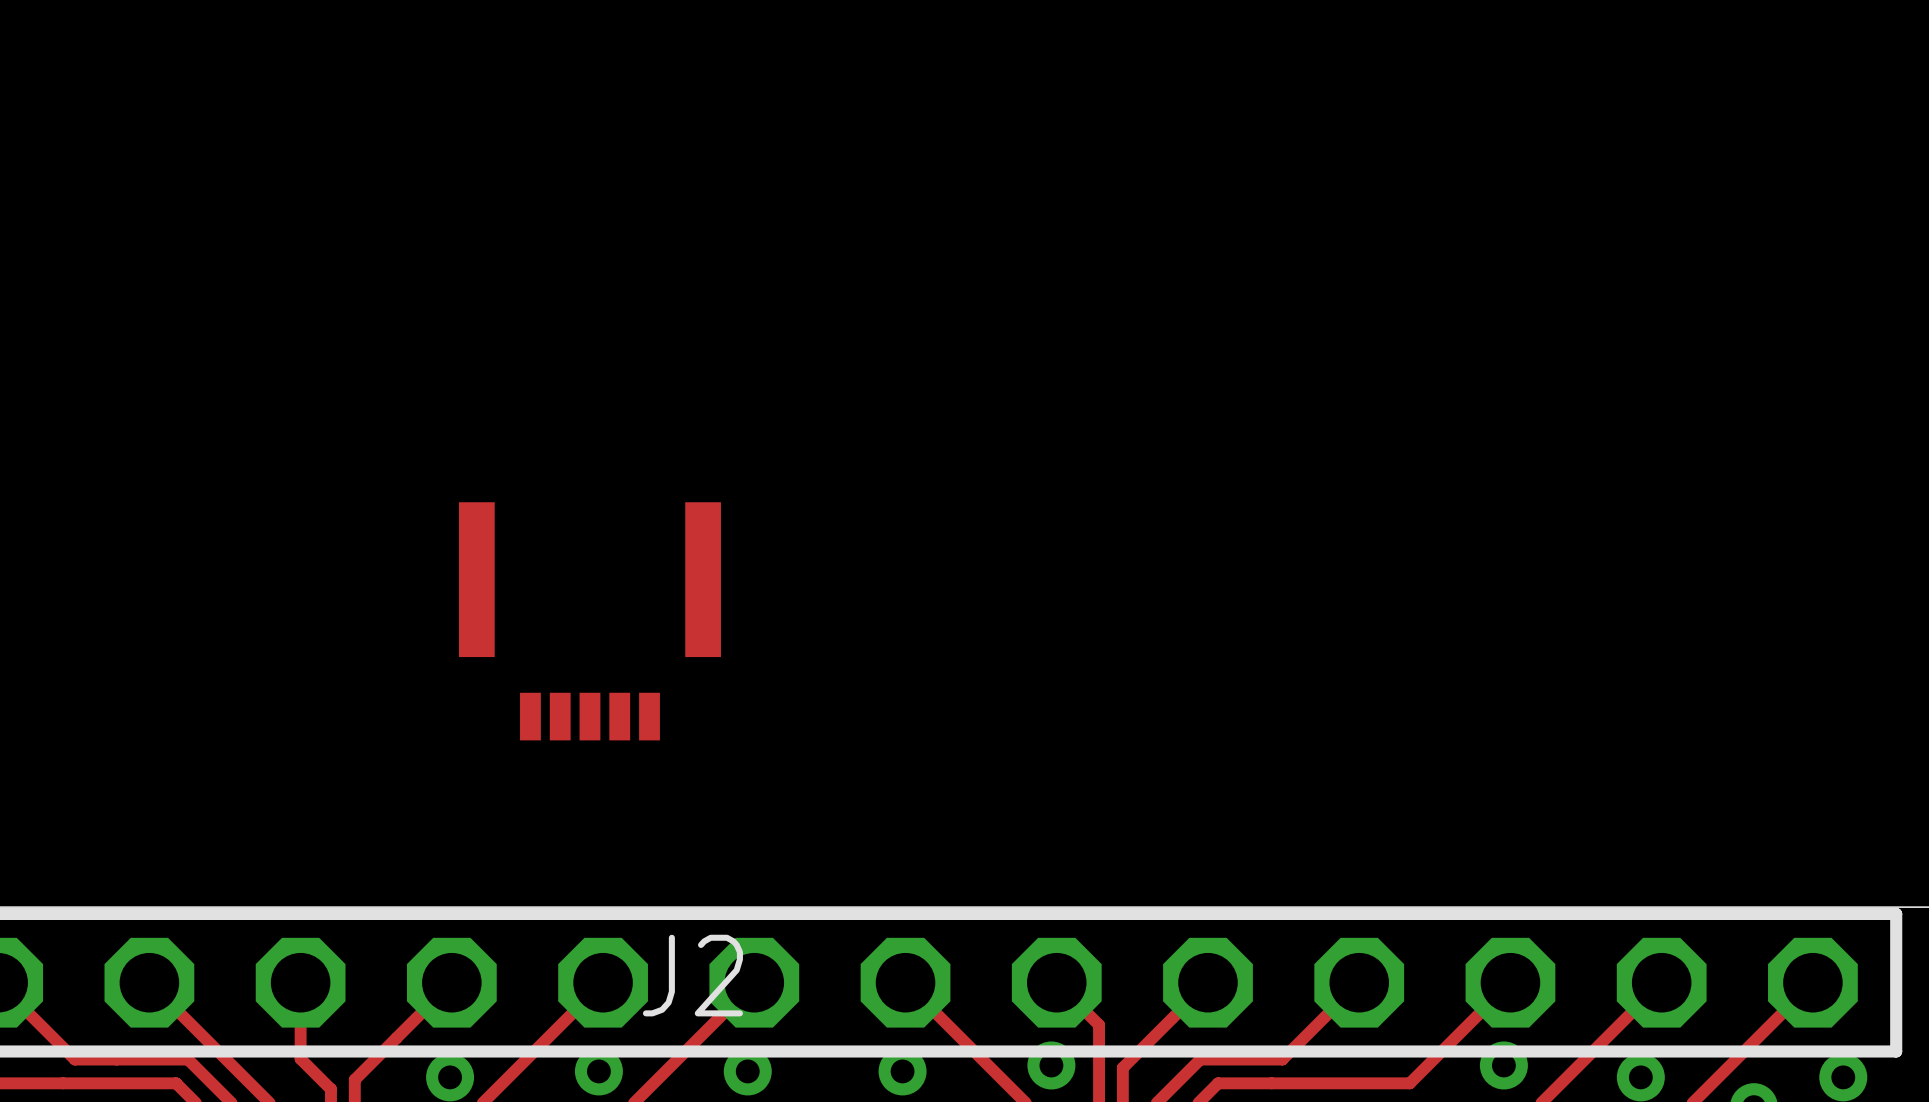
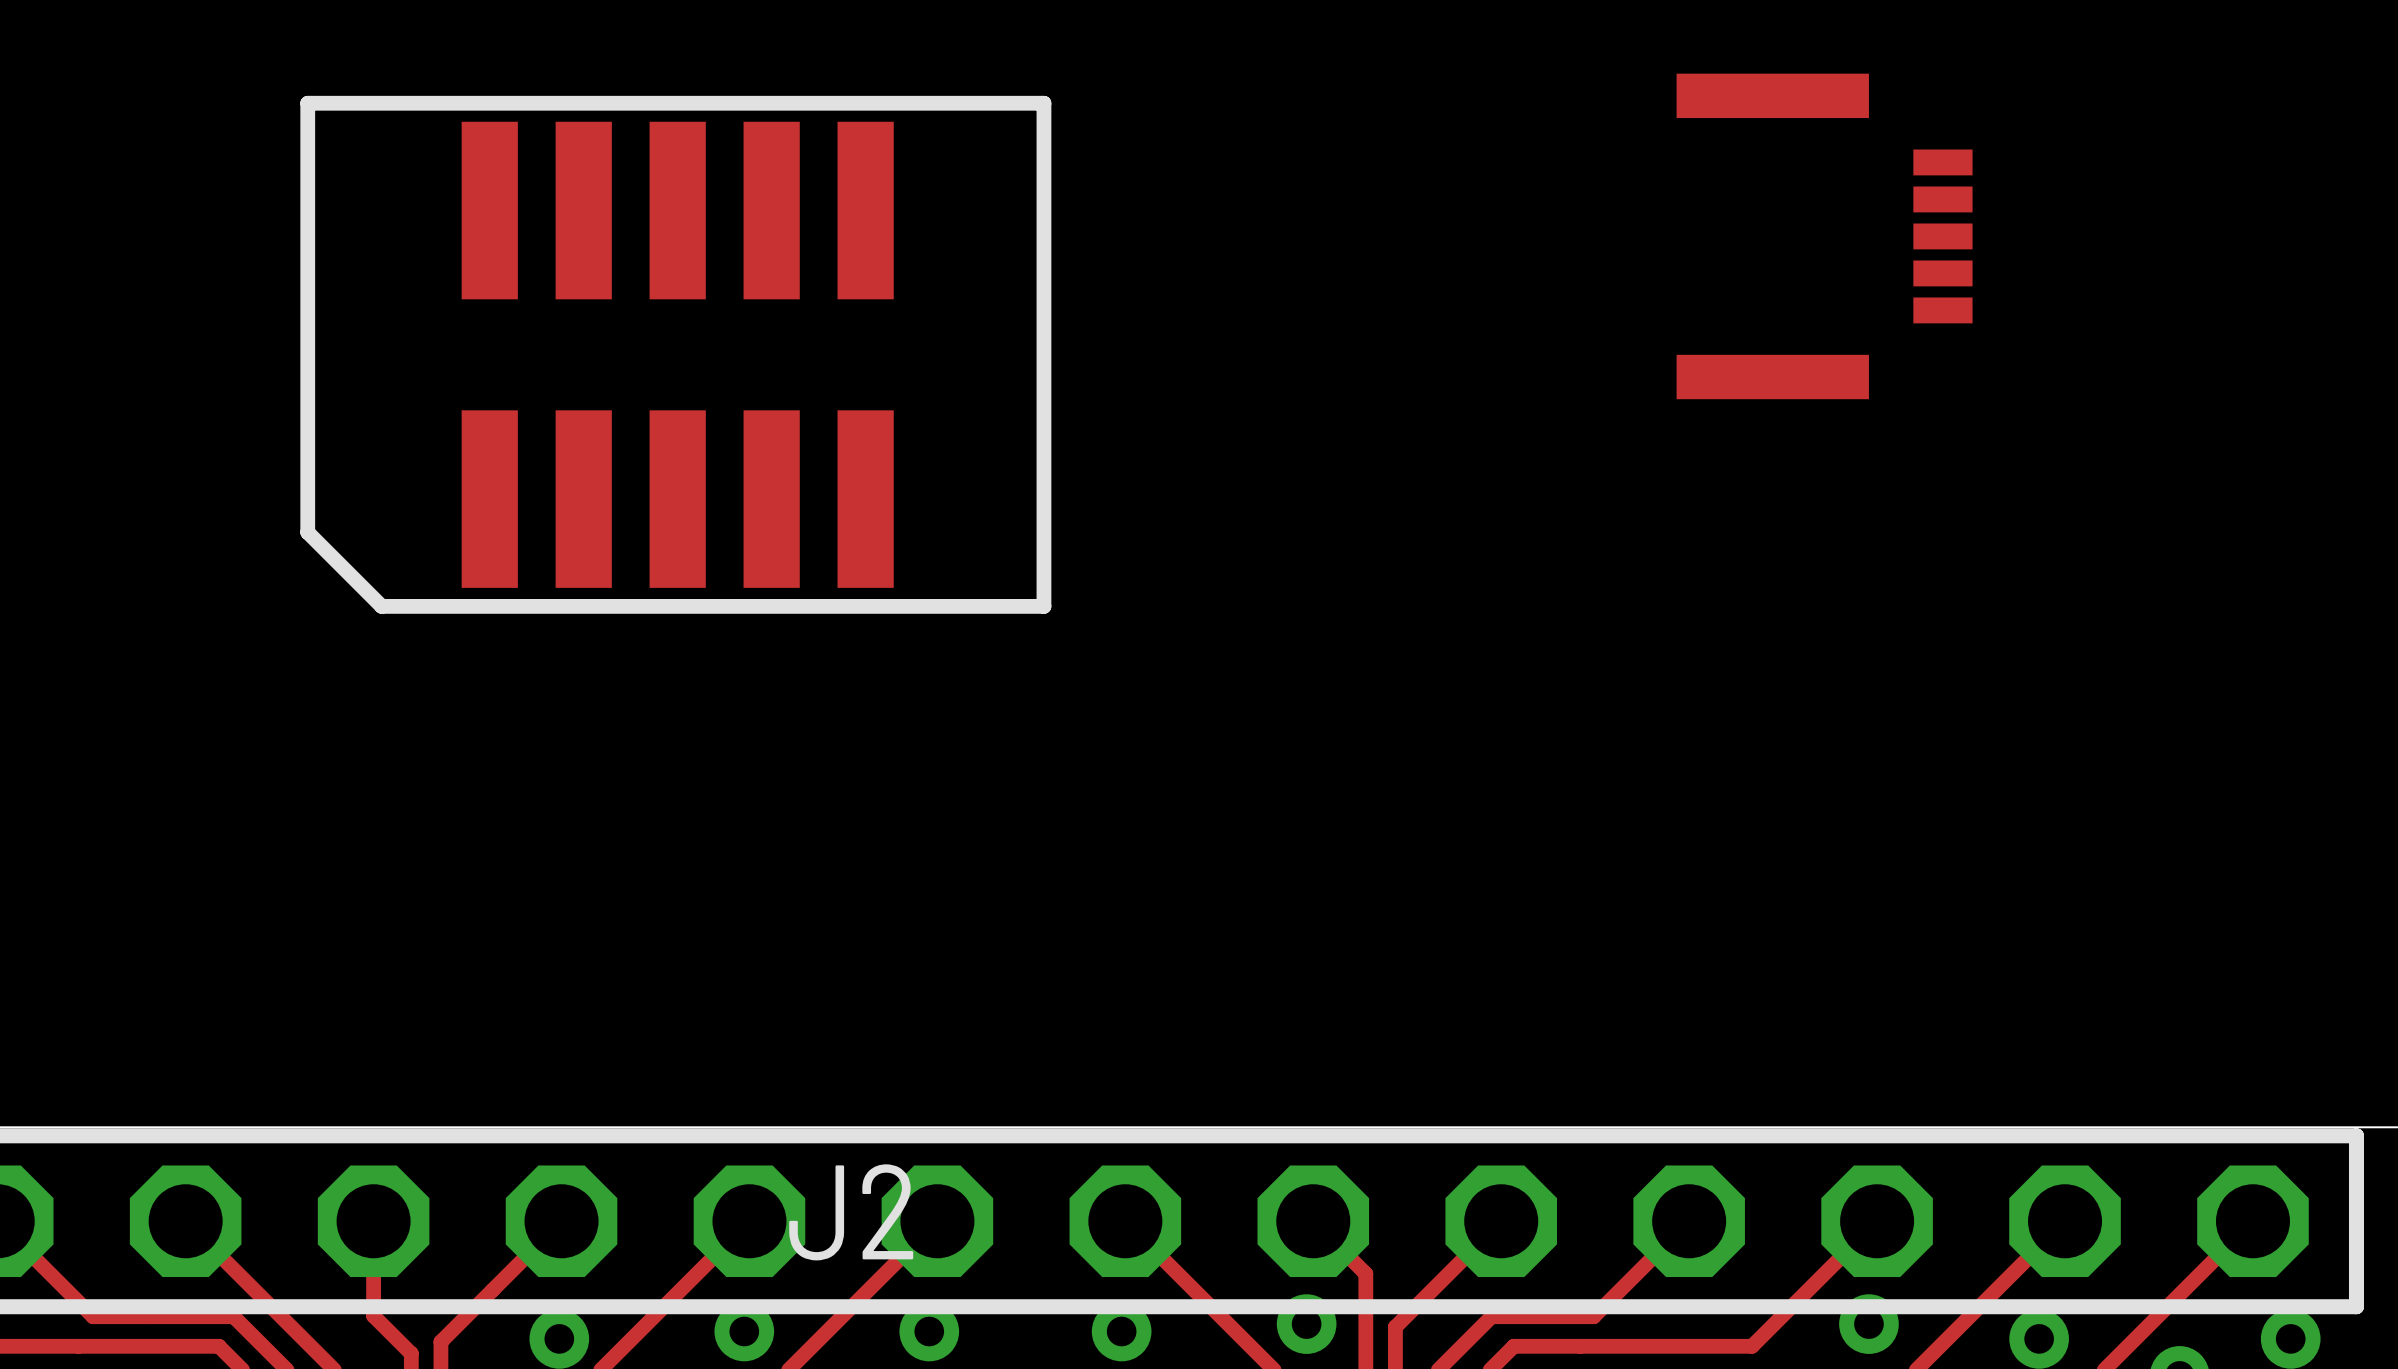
part: none -> (675, 354)
part rotation: 0° (589, 621) -> 90° counterclockwise (1824, 236)
part position: (589, 621) -> (1824, 236)

